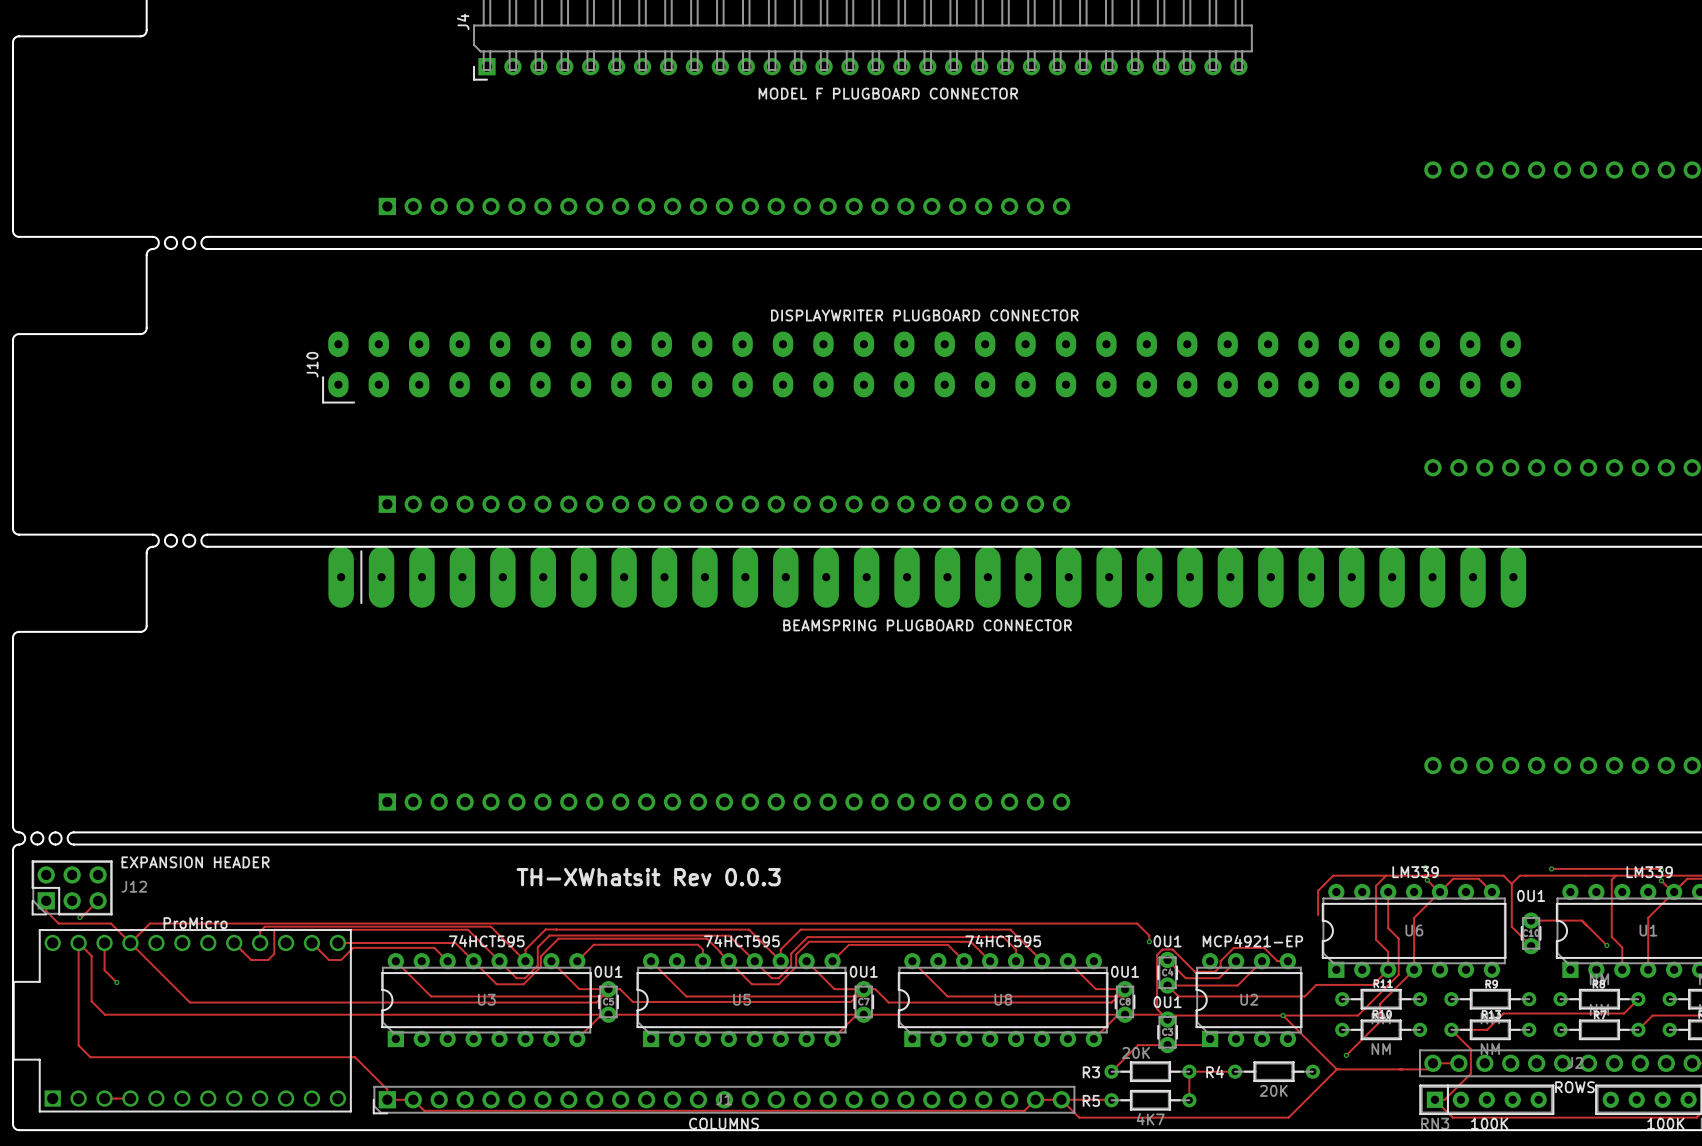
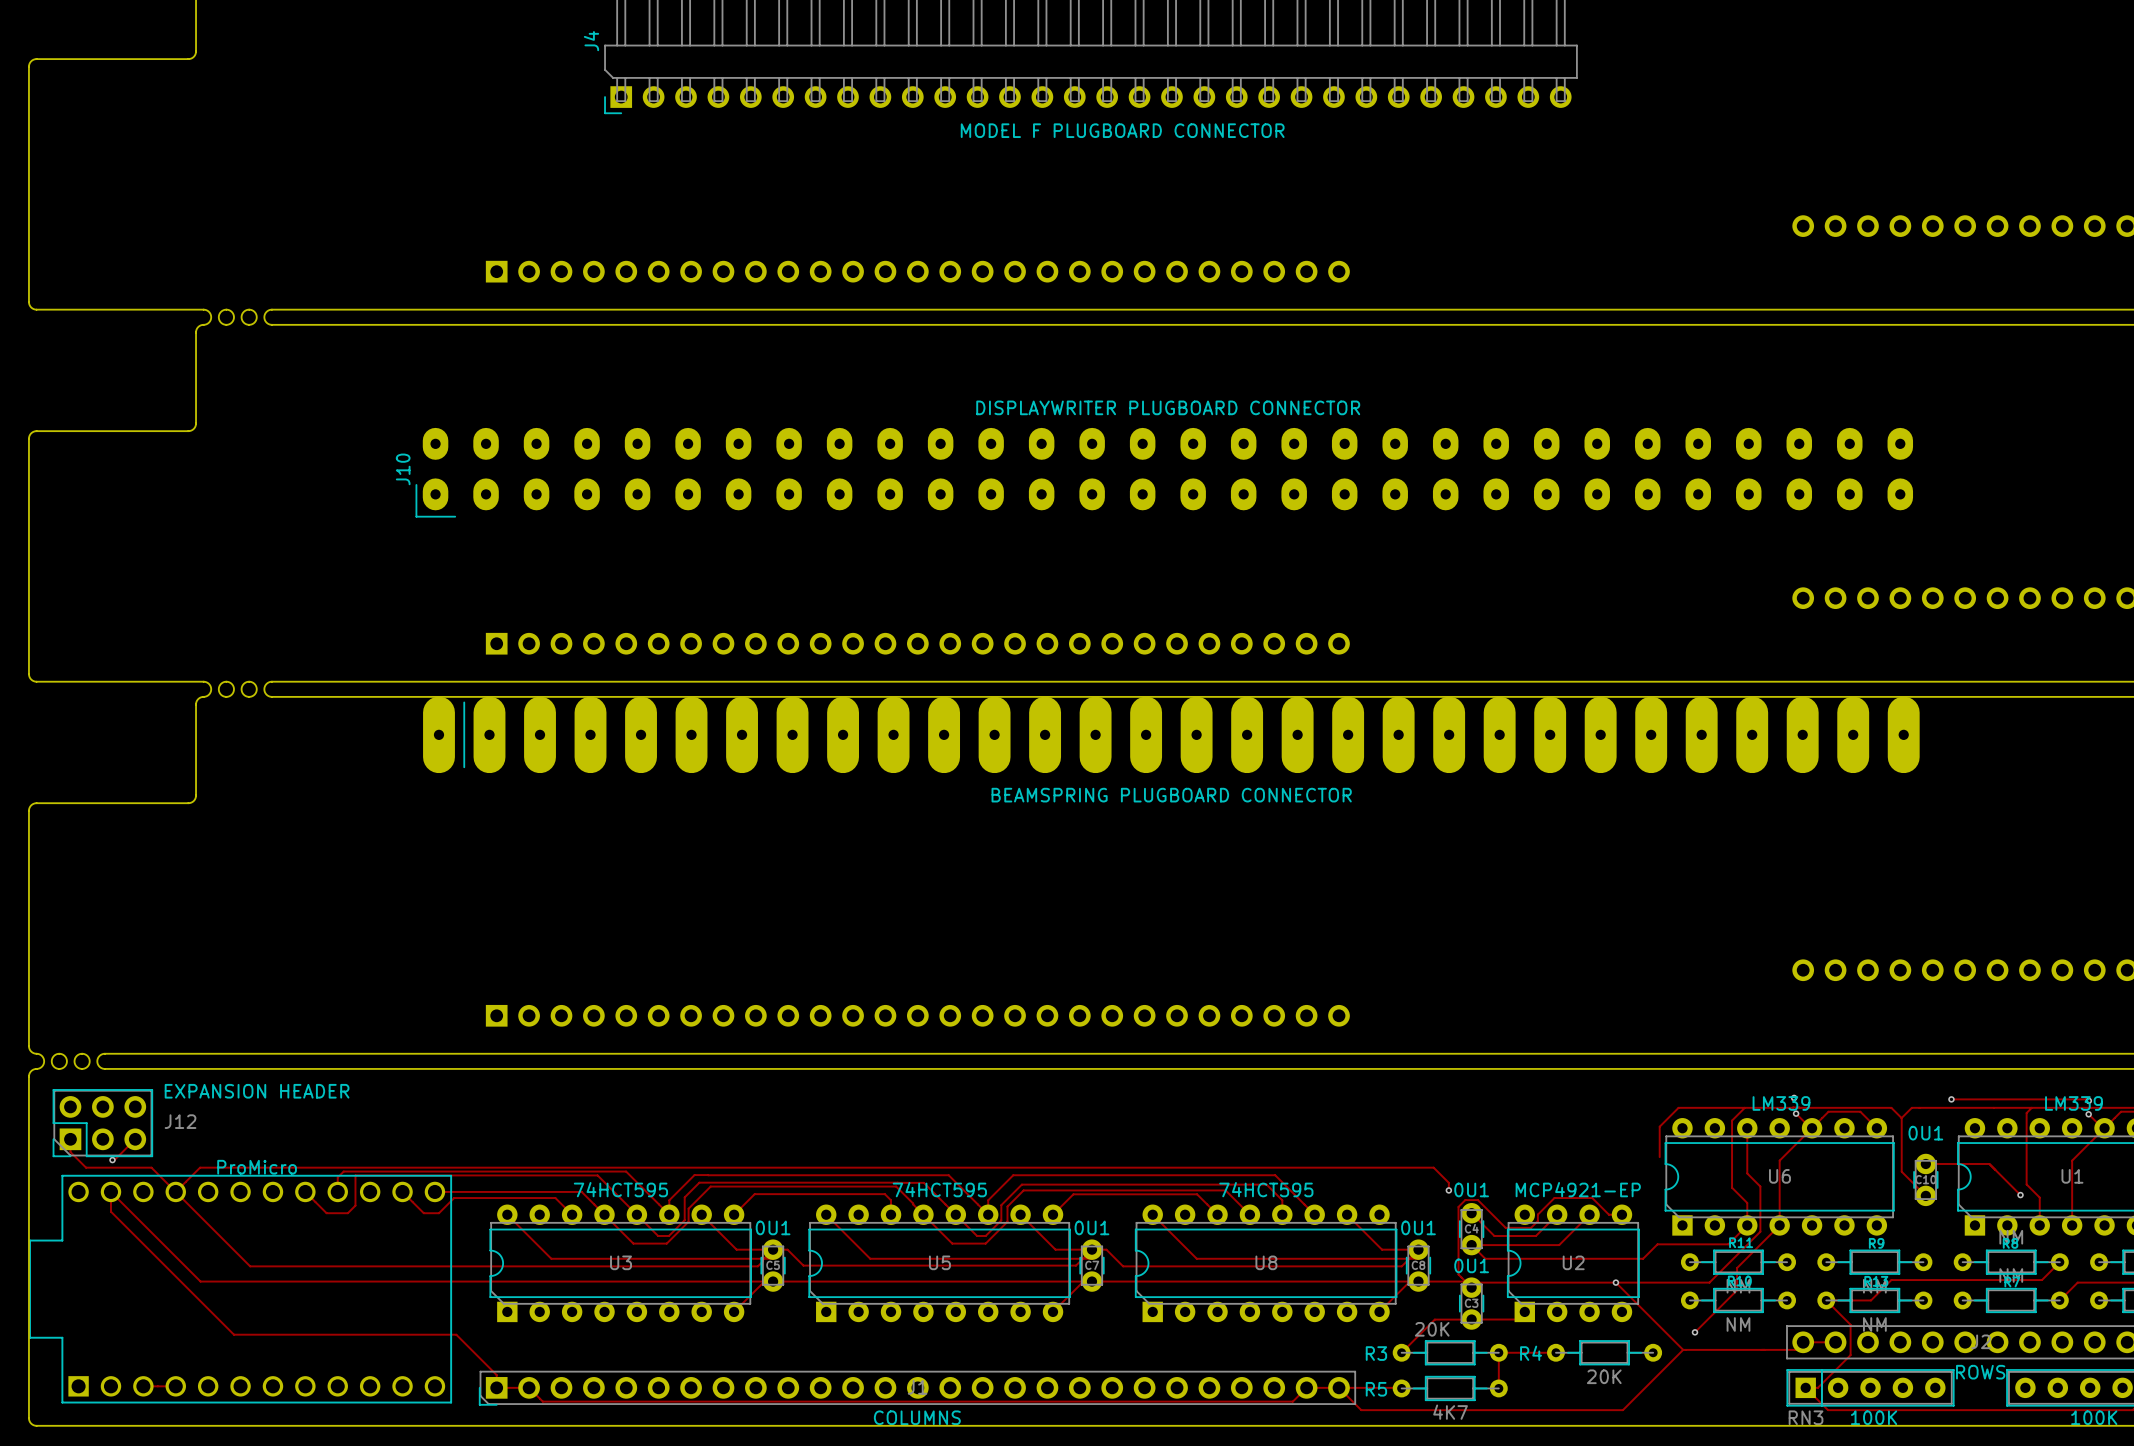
text: TH-XWhatsit Rev 0.0.3 (648, 877) -> none
track: (104, 942) (104, 970) (116, 982) -> none
track: (91, 955) (91, 1001) (104, 1014) (150, 1014) -> (127, 1208) (200, 1281)
track: (78, 958) (78, 1045) (90, 1057) (177, 1057) -> (110, 1211) (233, 1334)
via: (116, 982) -> none

